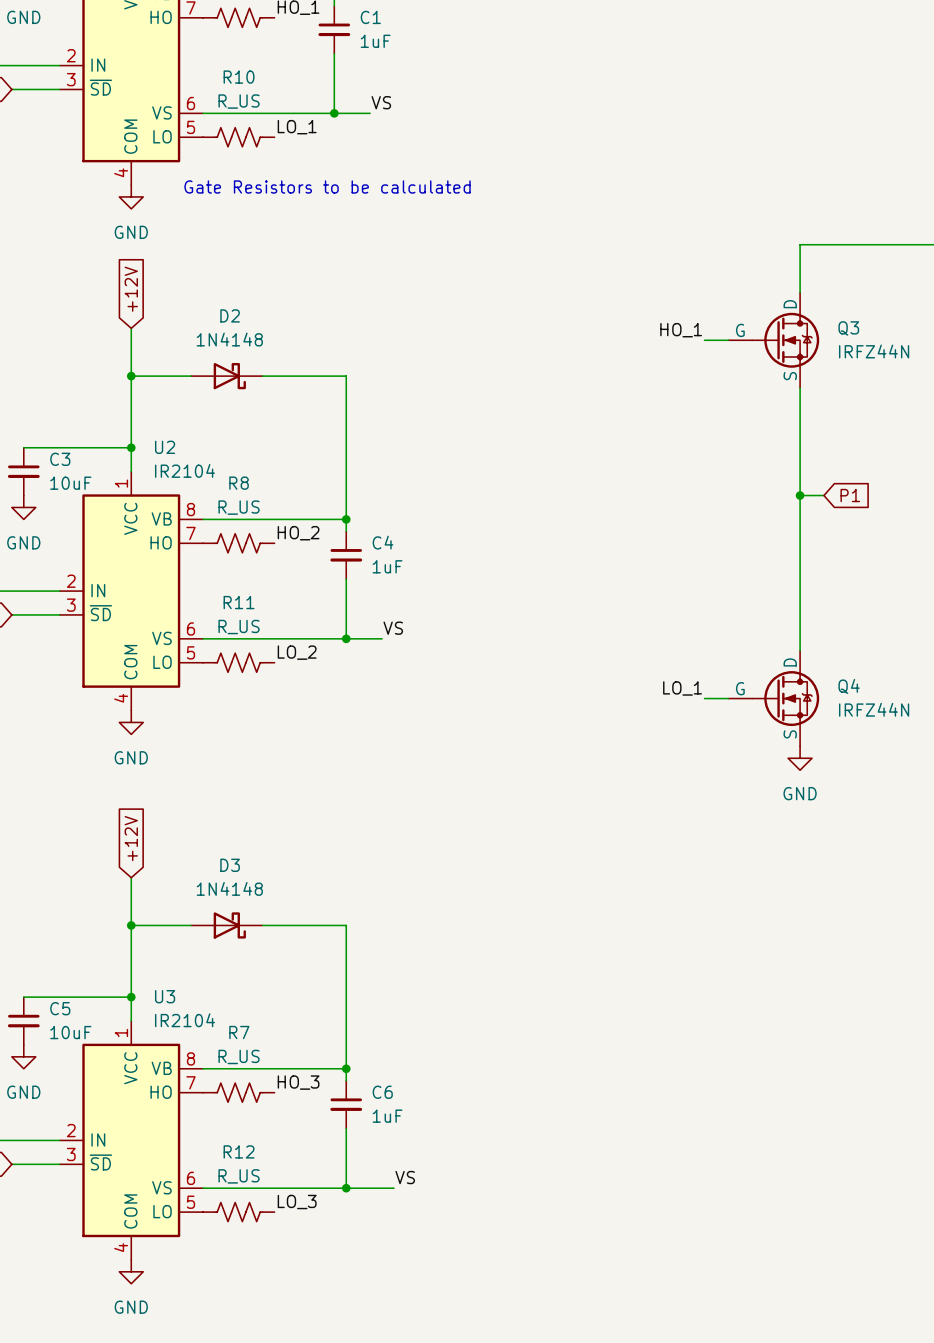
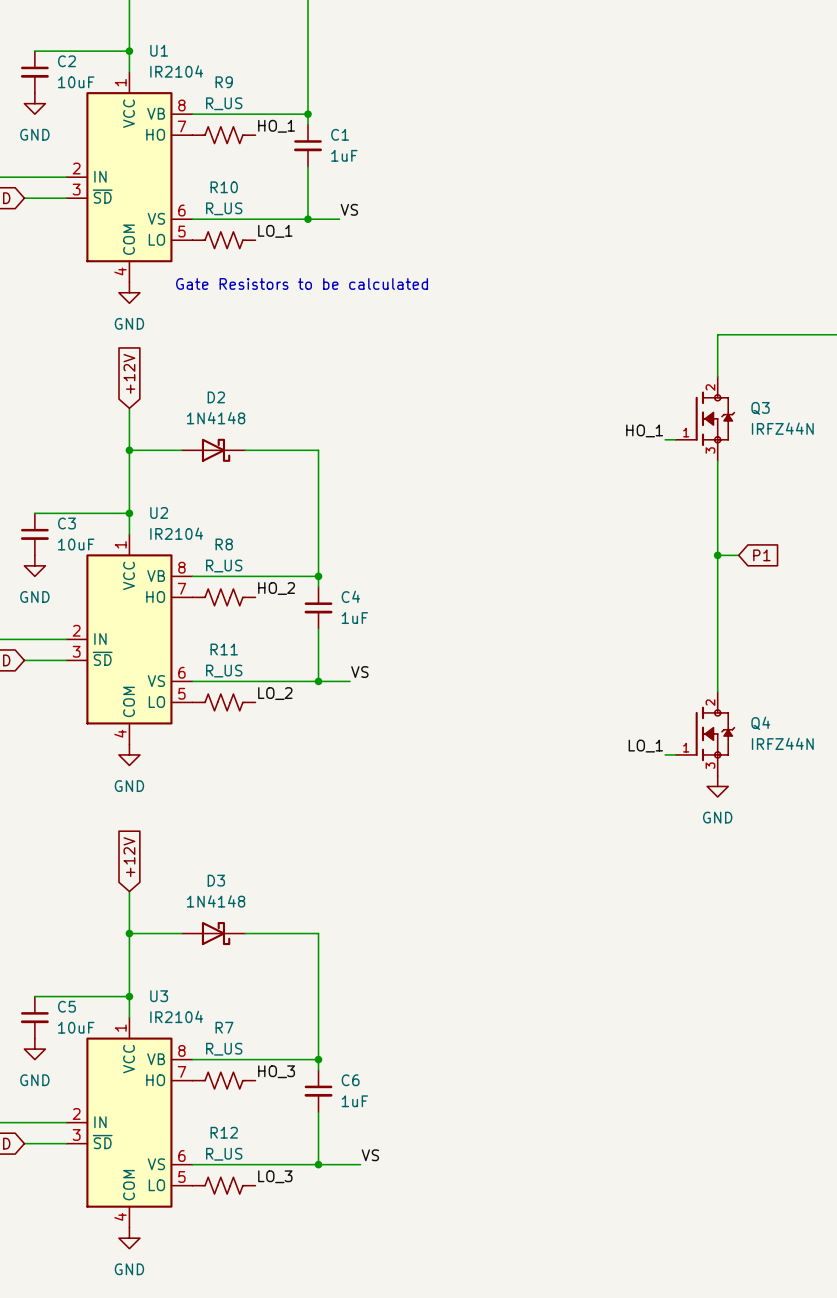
Q3 symbol: [728, 292, 820, 389] -> [675, 376, 736, 461]
label position: HO_1 (681, 330) -> HO_1 (644, 430)
wire: (704, 340) (728, 340) -> none
wire: none -> (665, 439) (675, 439)
Q4 symbol: [728, 650, 820, 747] -> [675, 691, 736, 776]
label position: LO_1 (682, 688) -> LO_1 (645, 746)
wire: (704, 698) (728, 698) -> none
wire: none -> (665, 754) (675, 754)

